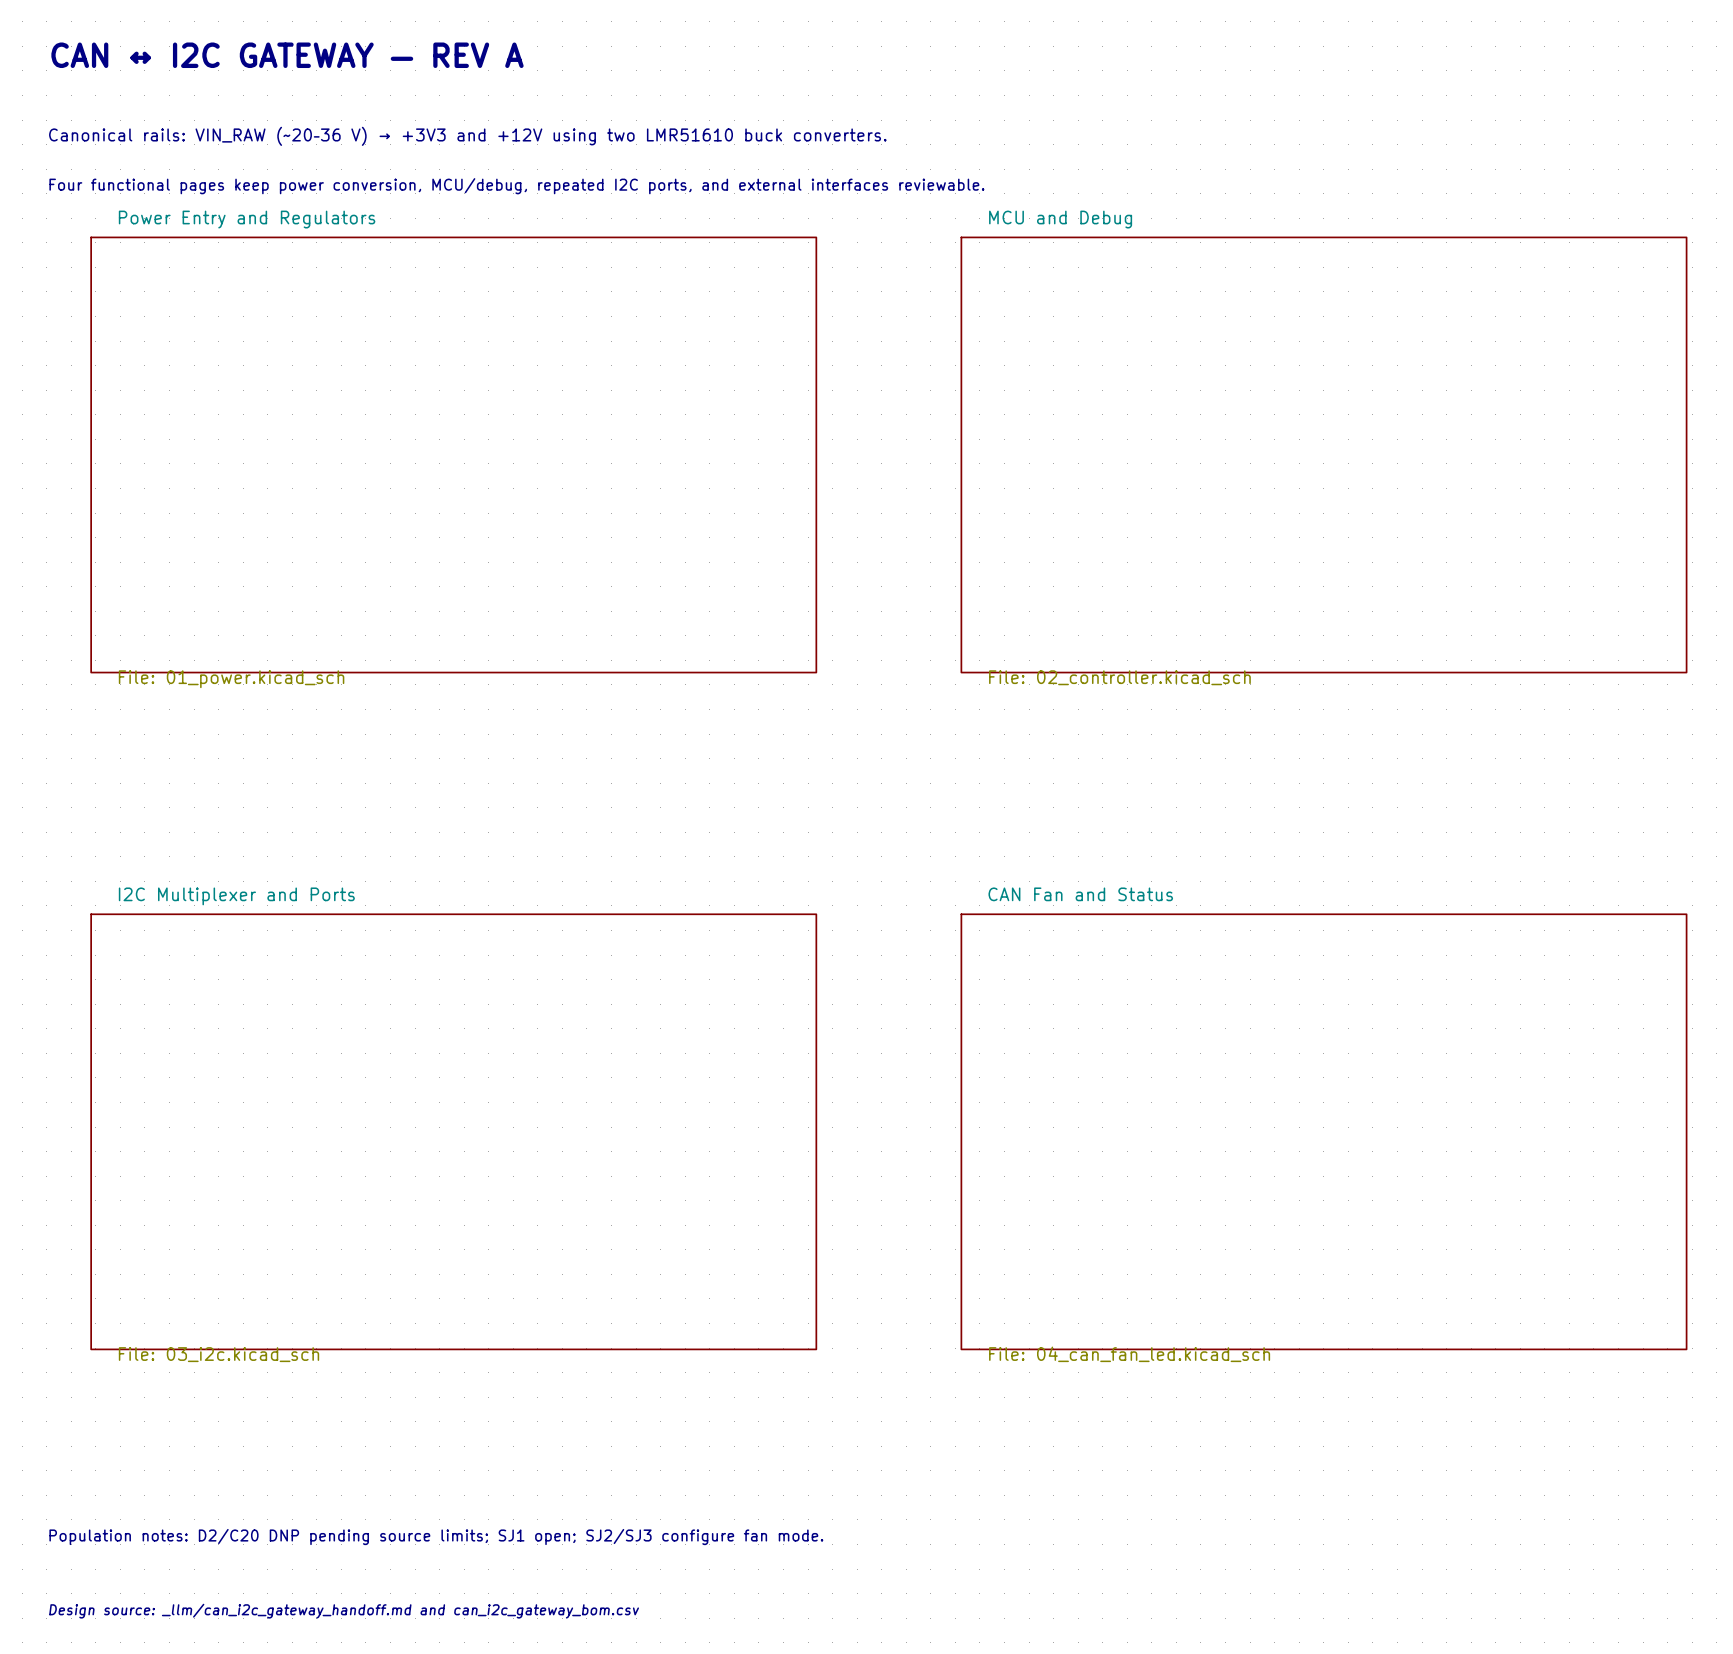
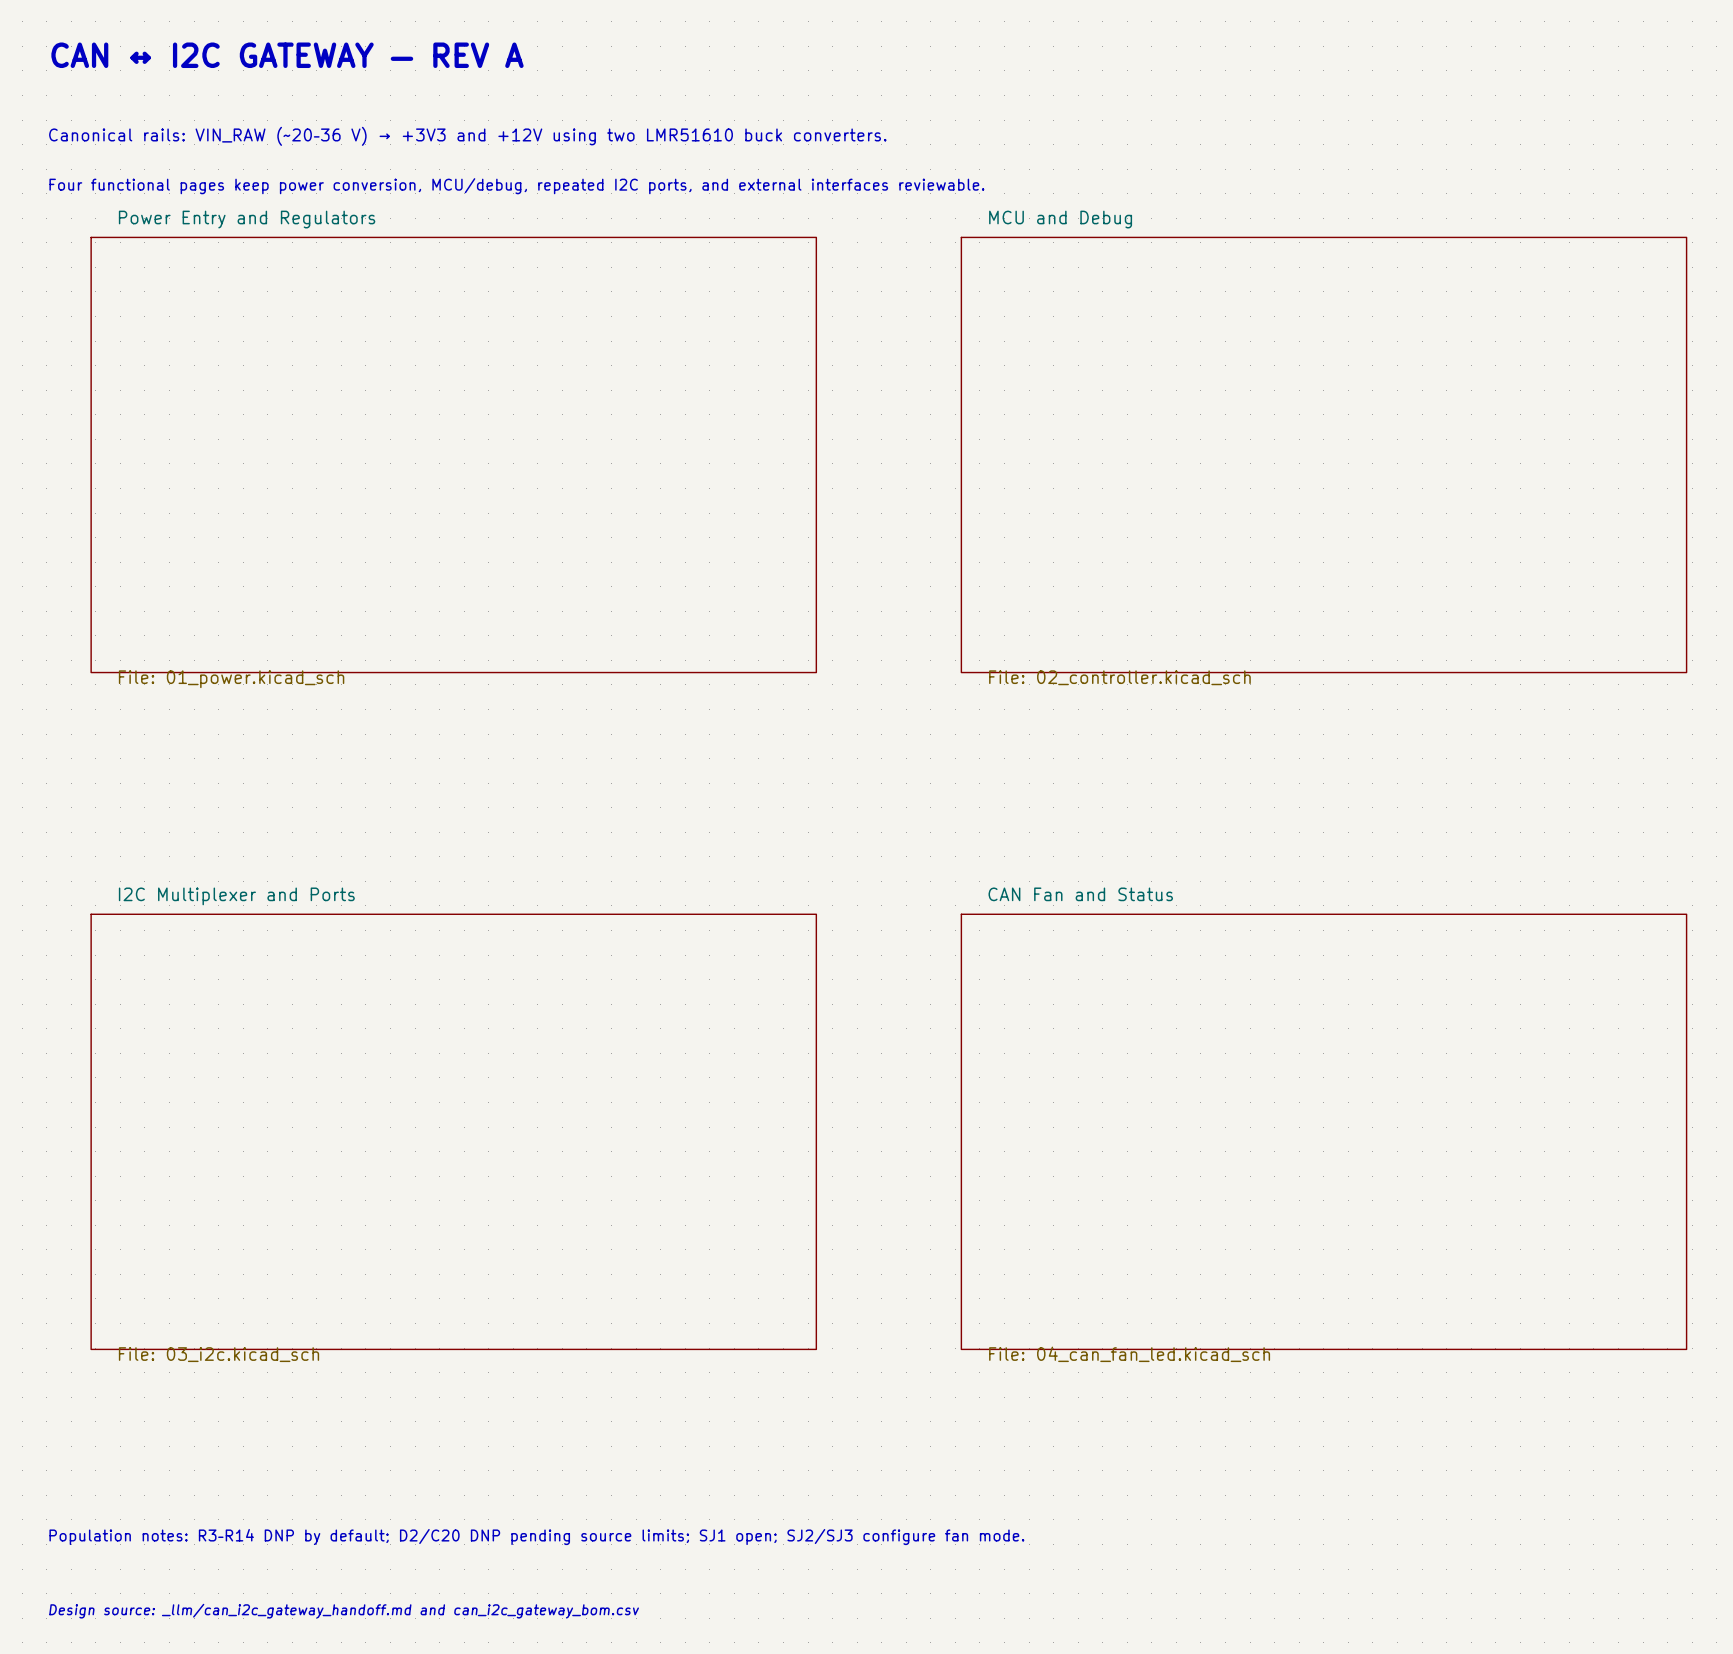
text: Population notes: D2/C20 DNP pending source limits; SJ1 open; SJ2/SJ3 configure fan mode. (436, 1537) -> Population notes: R3–R14 DNP by default; D2/C20 DNP pending source limits; SJ1 open; SJ2/SJ3 configure fan mode. (536, 1537)

